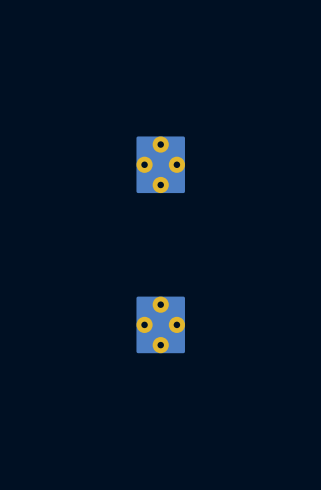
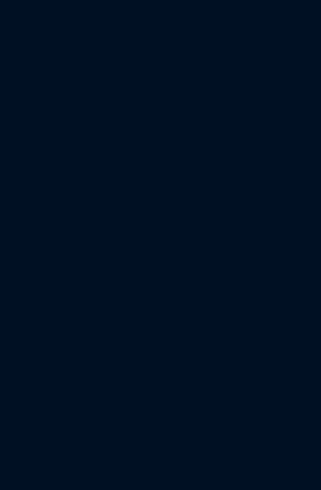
part: (160, 164) -> none
part: (160, 324) -> none

